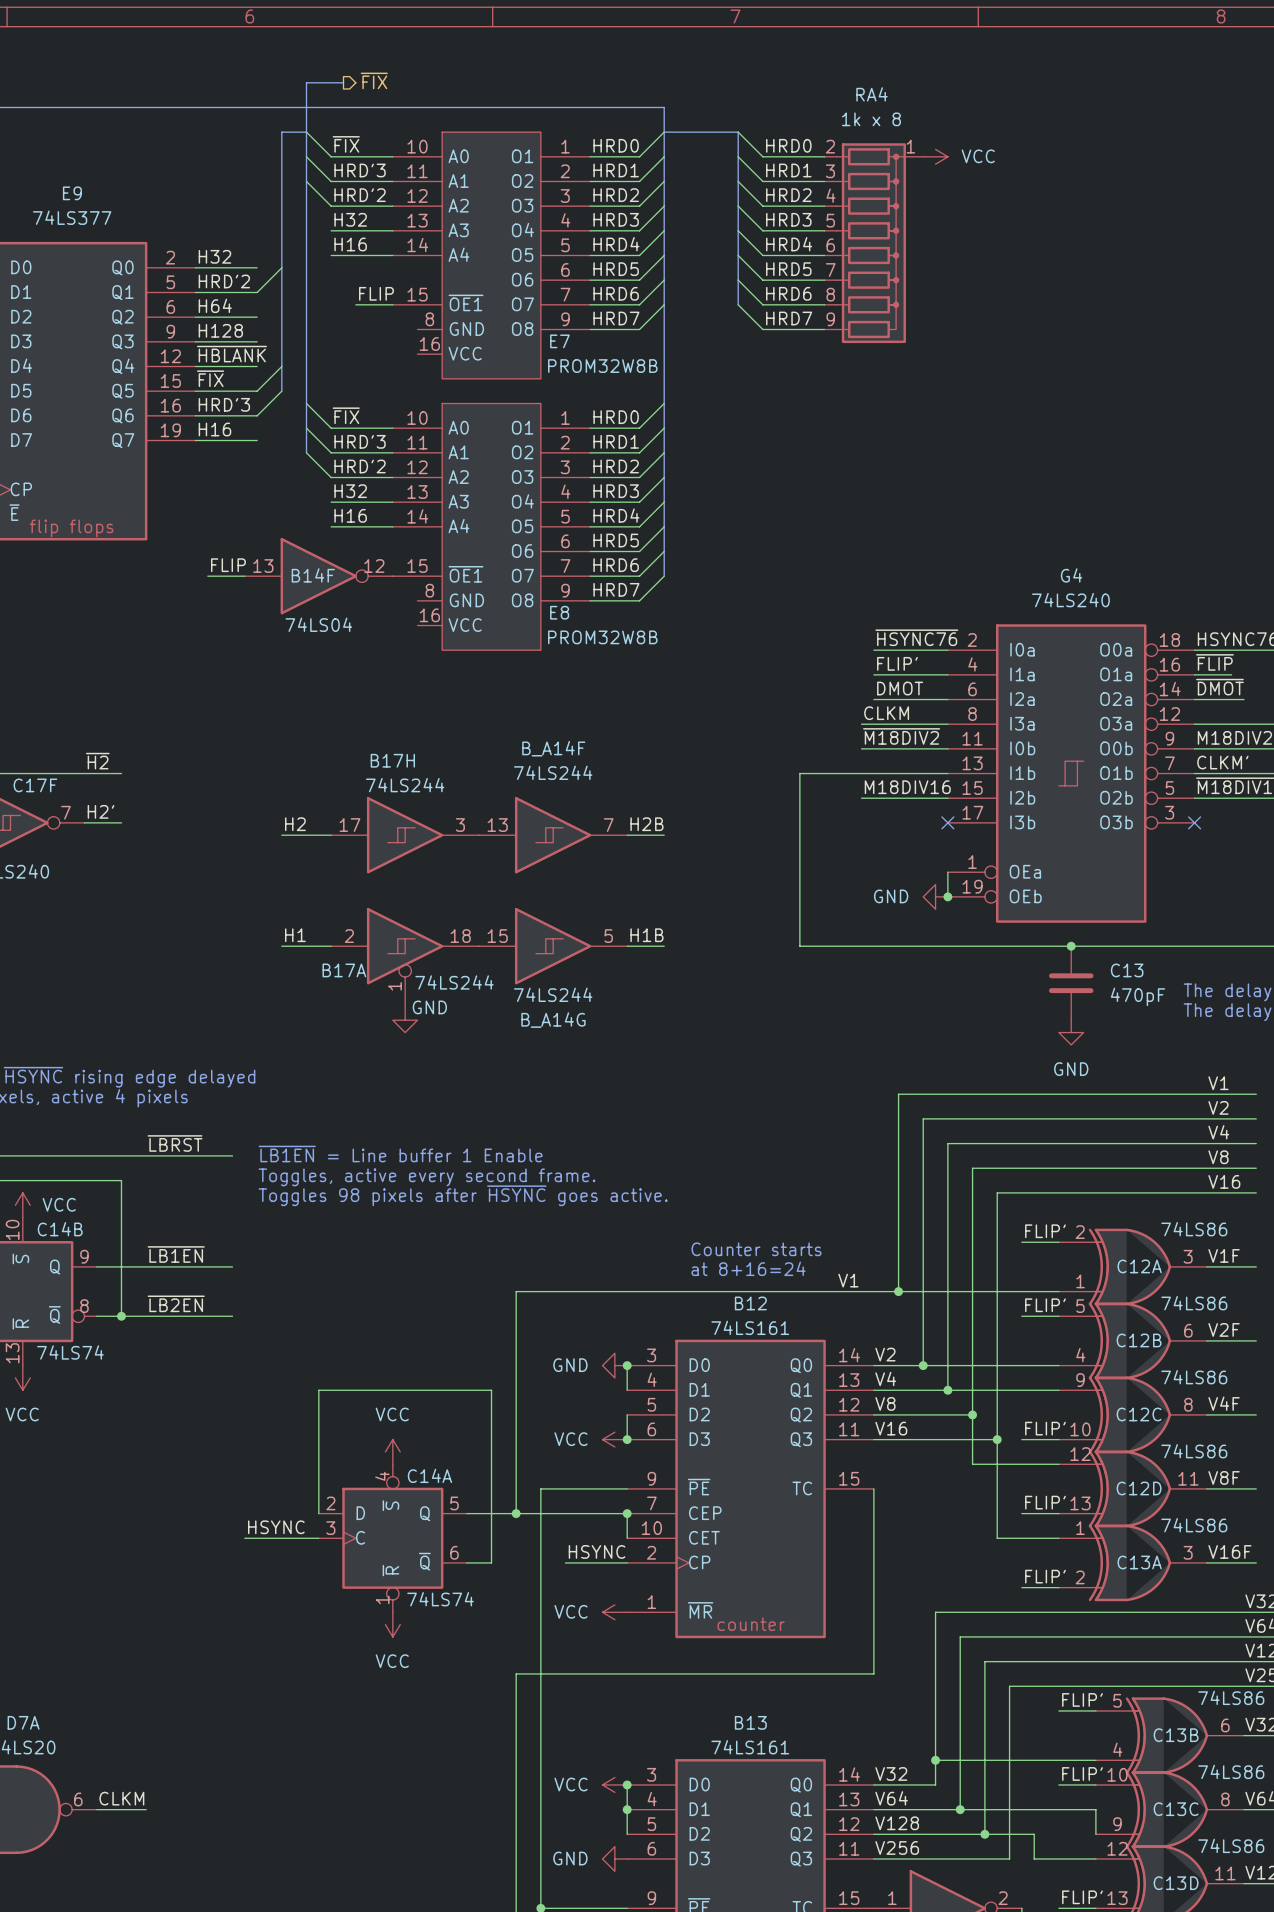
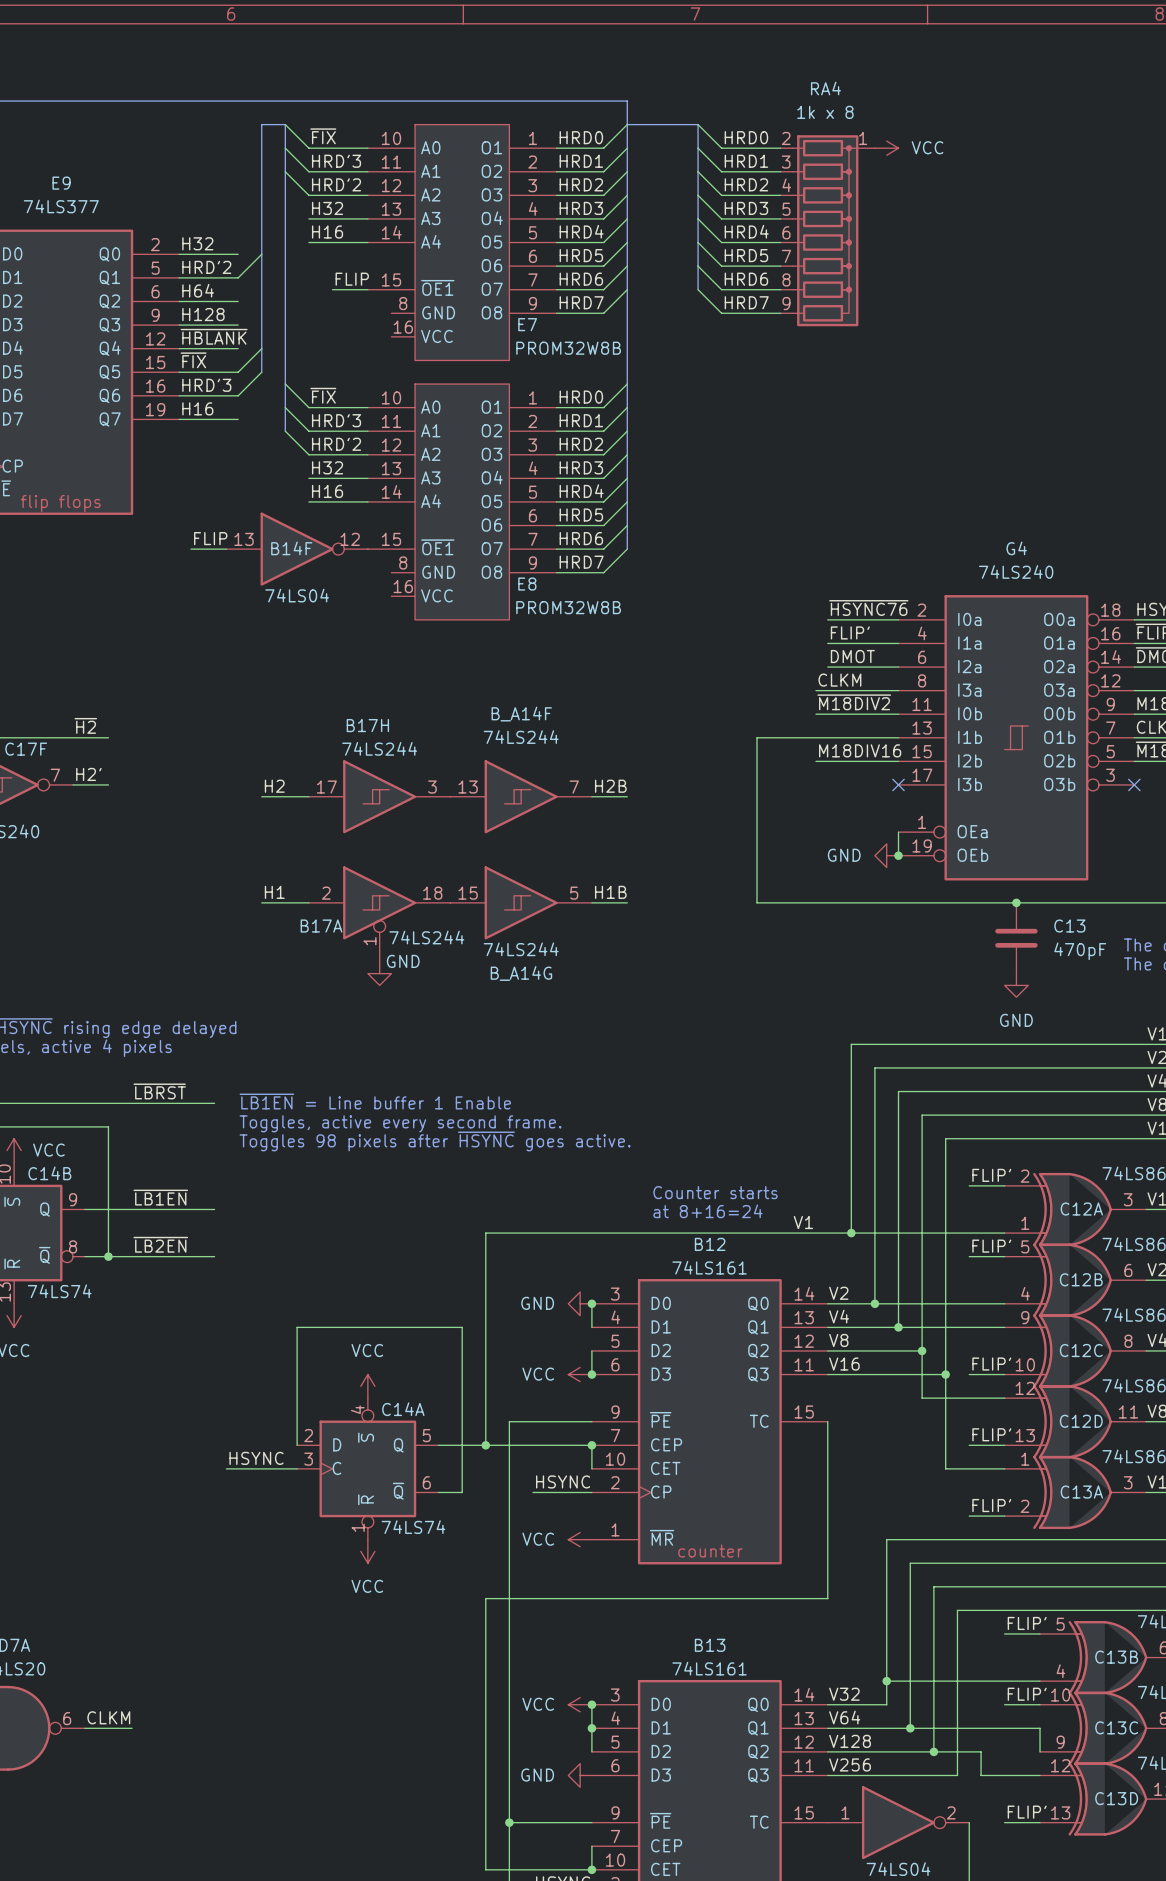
hierarchical label: ~{FIX} (374, 80) -> none
bus: (343, 82) (306, 82) (306, 132) -> none

